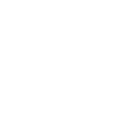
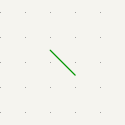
wire: none -> (50, 50) (75, 75)

